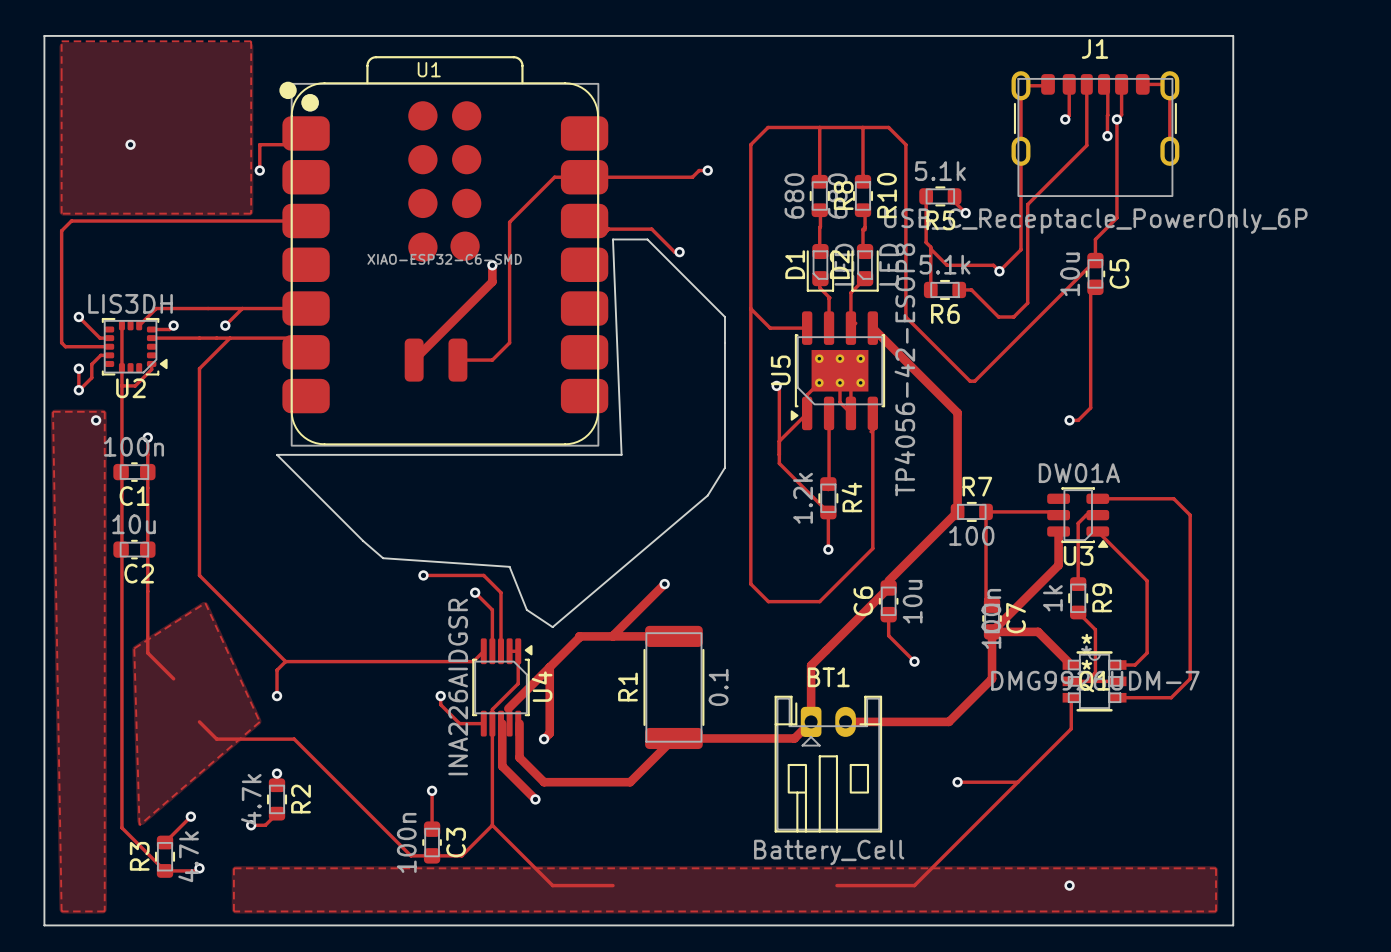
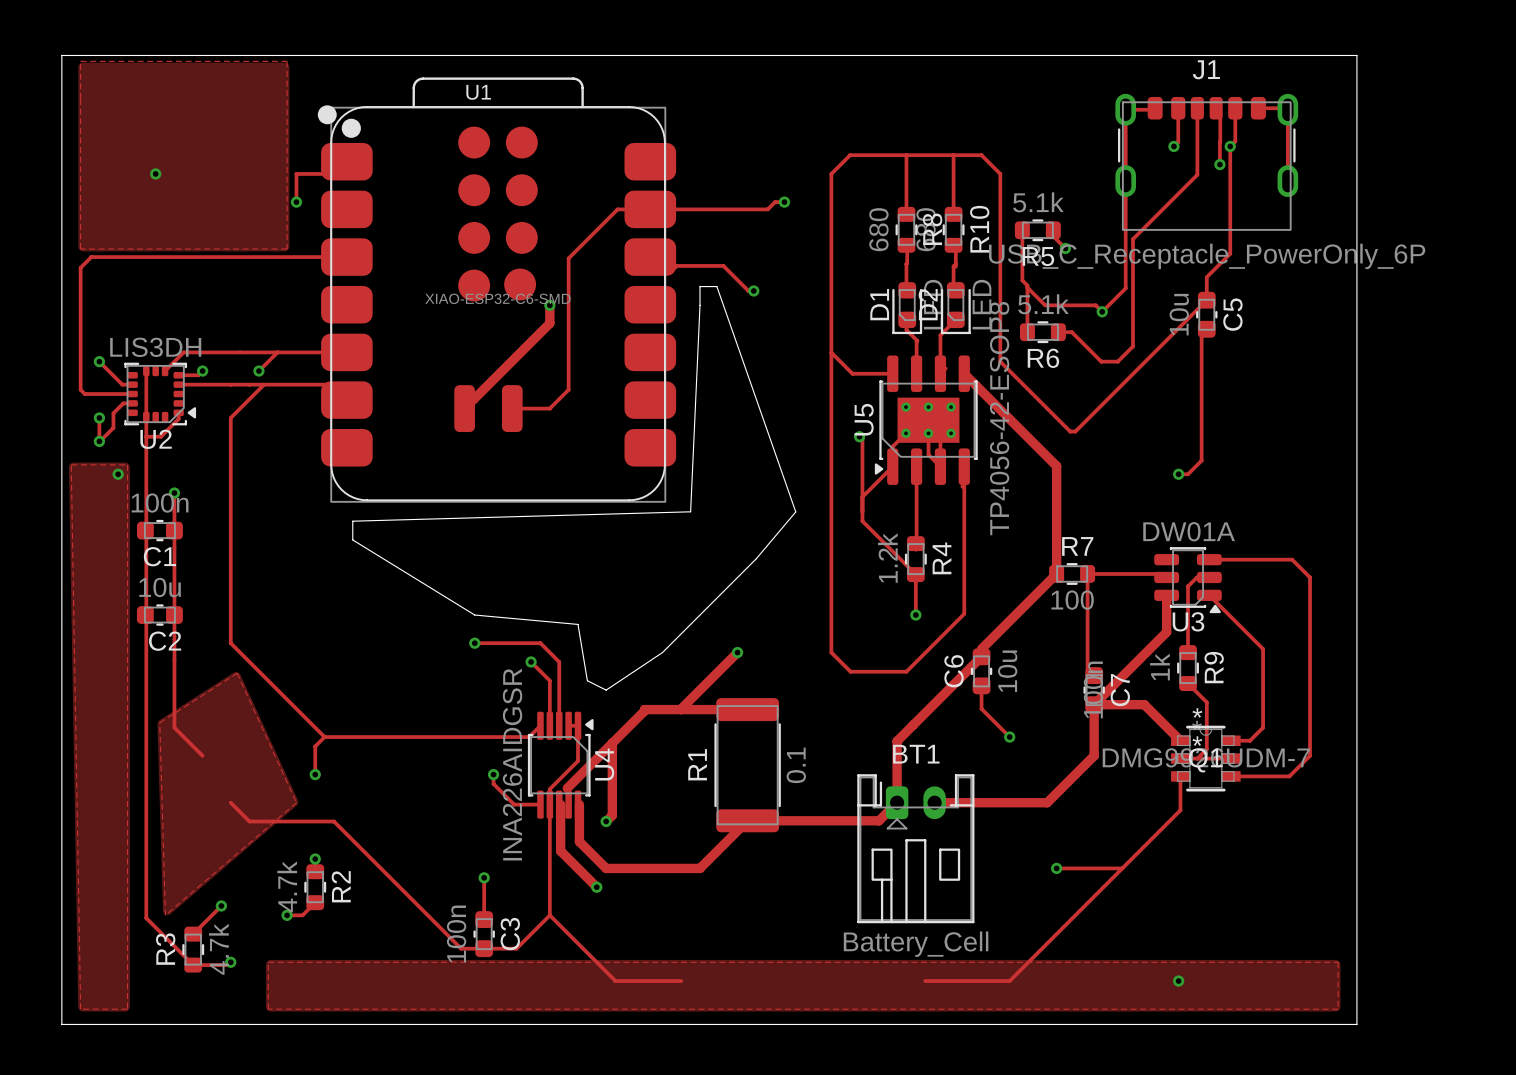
board edge: (612, 239) (621, 454) (277, 454) (363, 540) (383, 558) (509, 566) (526, 609) (552, 627) (707, 495) (724, 467) (724, 317) (647, 239) (612, 239) -> (700, 286) (690, 511) (352, 521) (352, 539) (474, 615) (578, 624) (587, 680) (606, 690) (662, 652) (756, 558) (795, 511) (716, 286) (700, 286)

